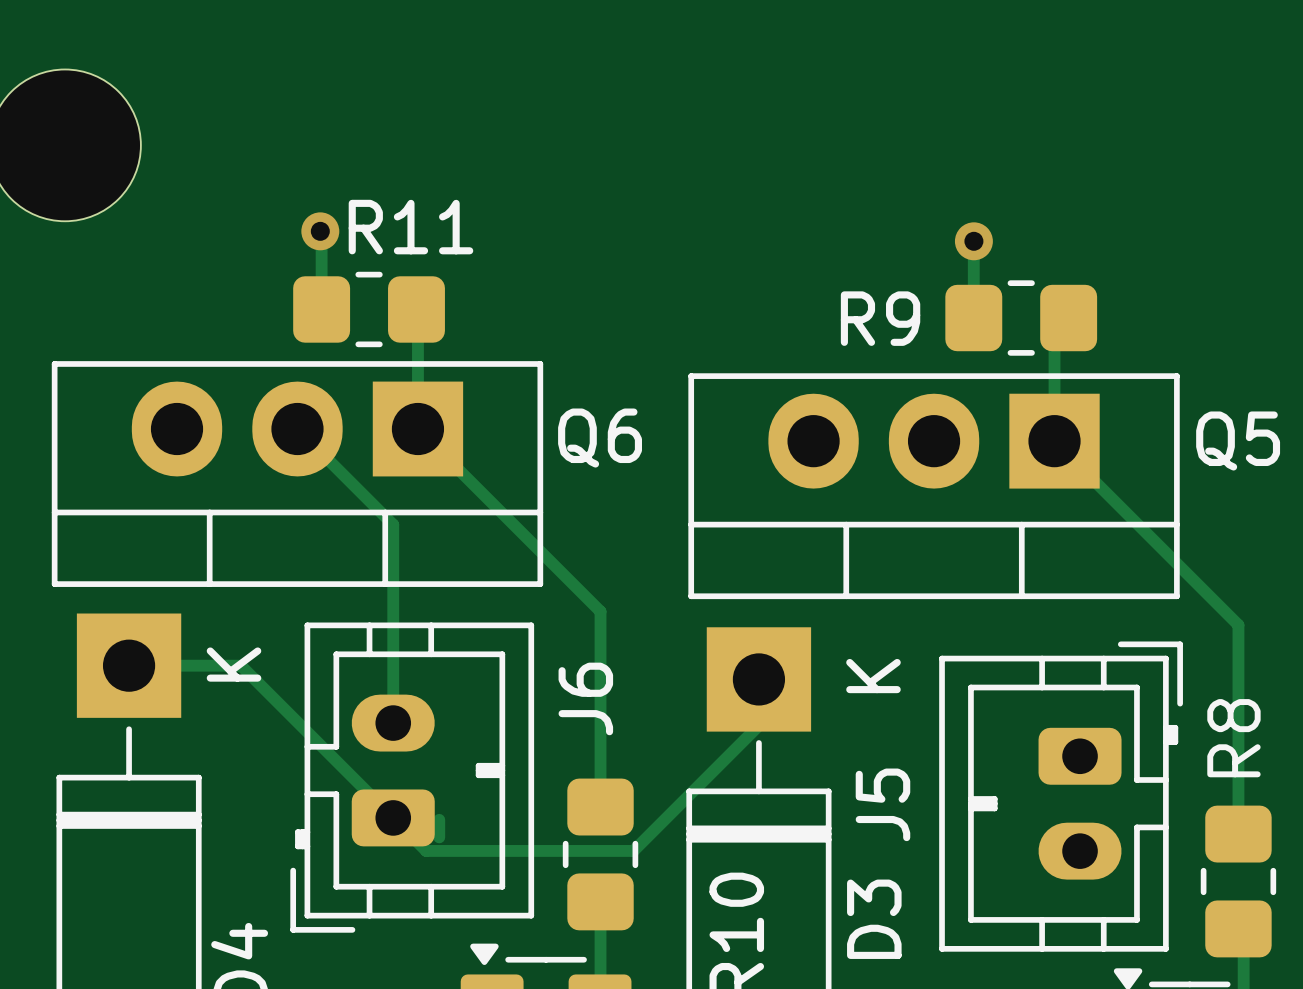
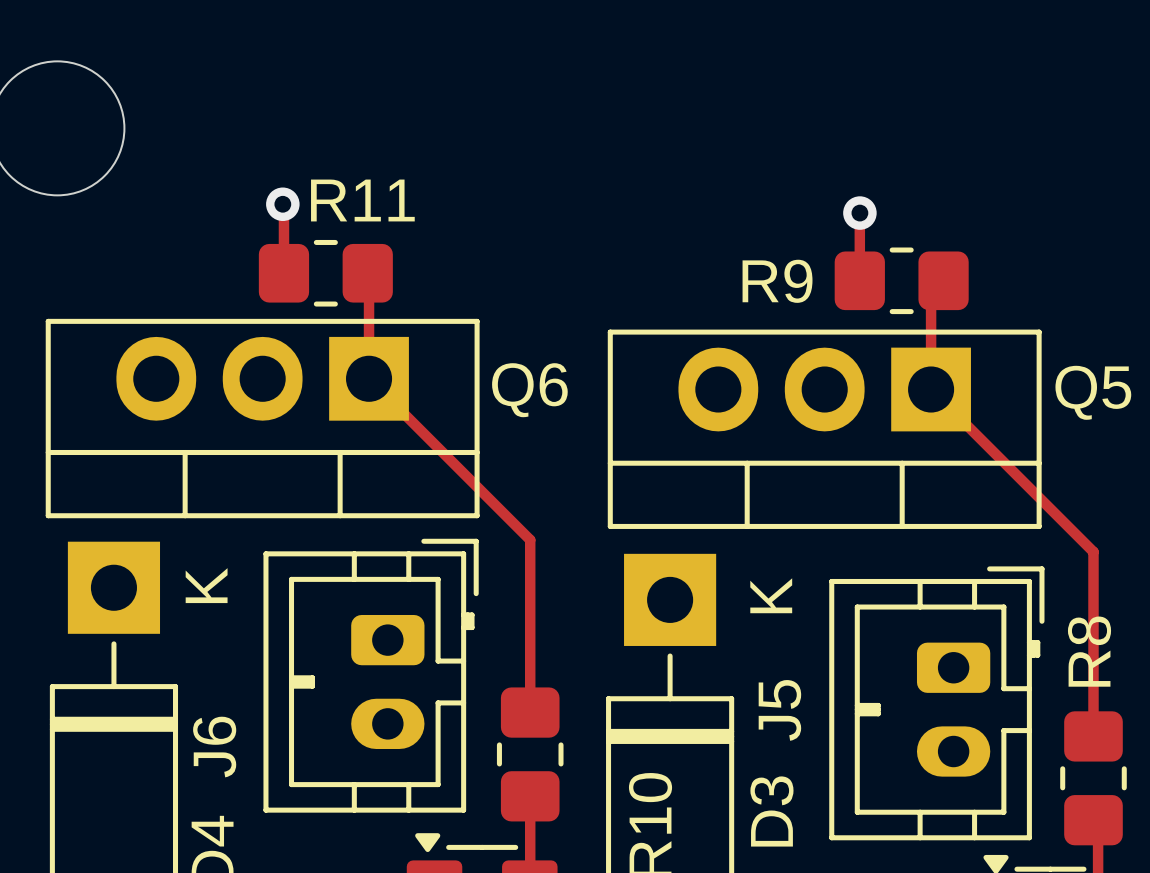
track: (297, 429) (393, 524) (393, 723) -> none
track: (129, 665) (240, 665) (426, 850) (633, 850) (758, 725) (758, 679) -> none
J6 rotation: 0° (412, 777) -> 180° (371, 675)

